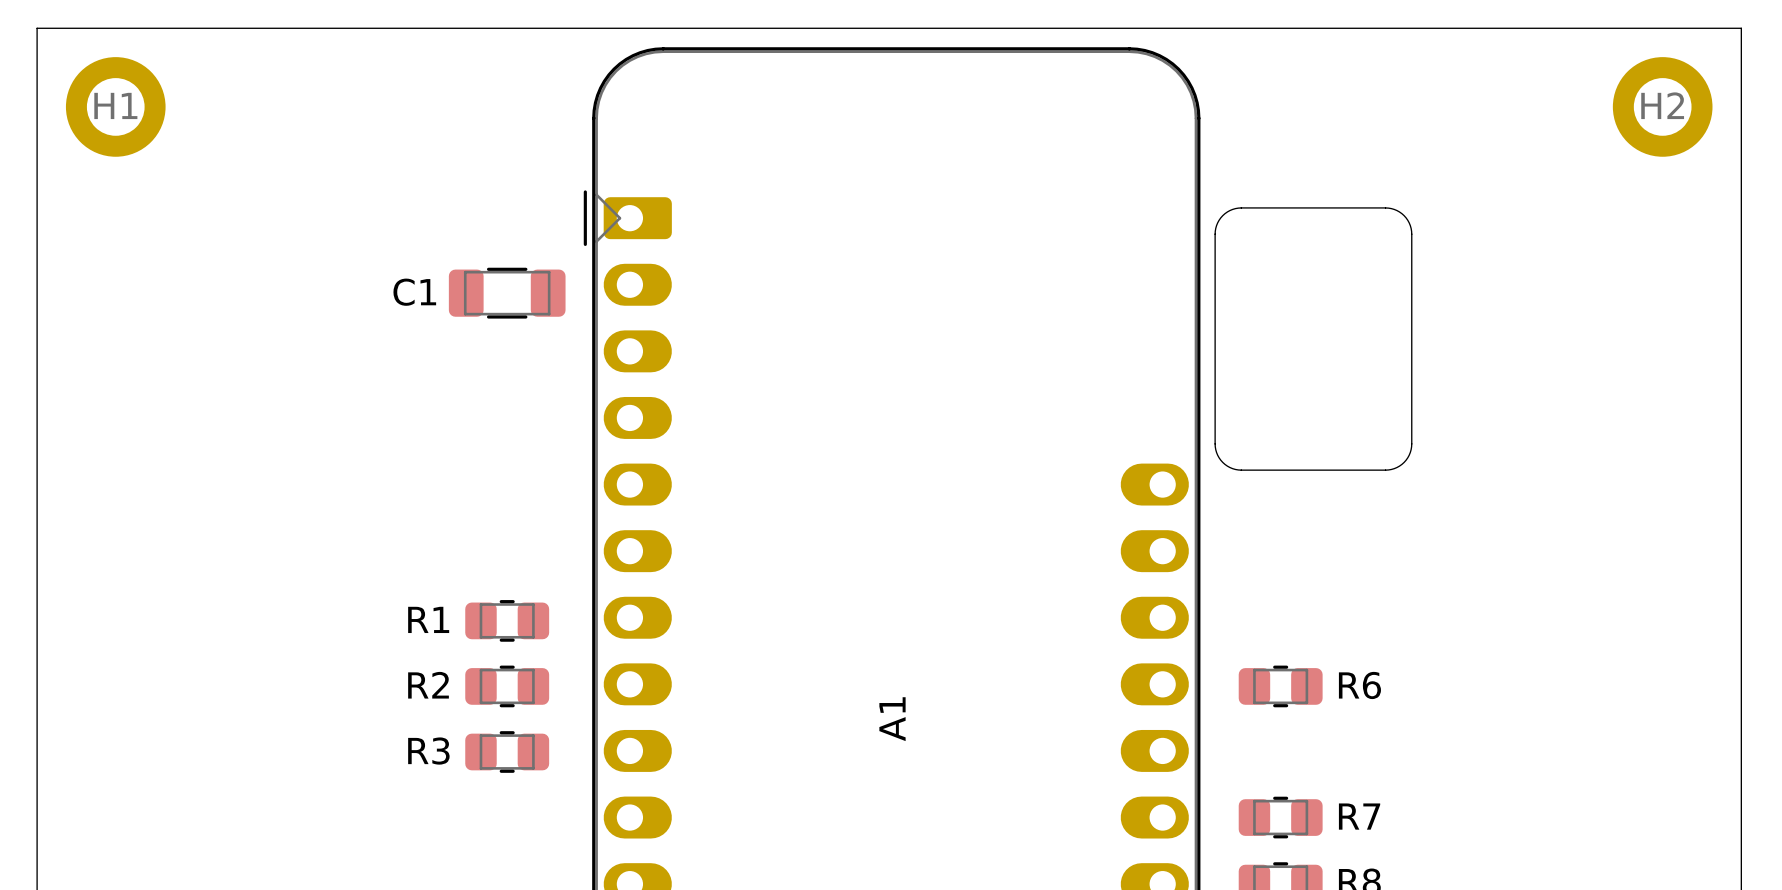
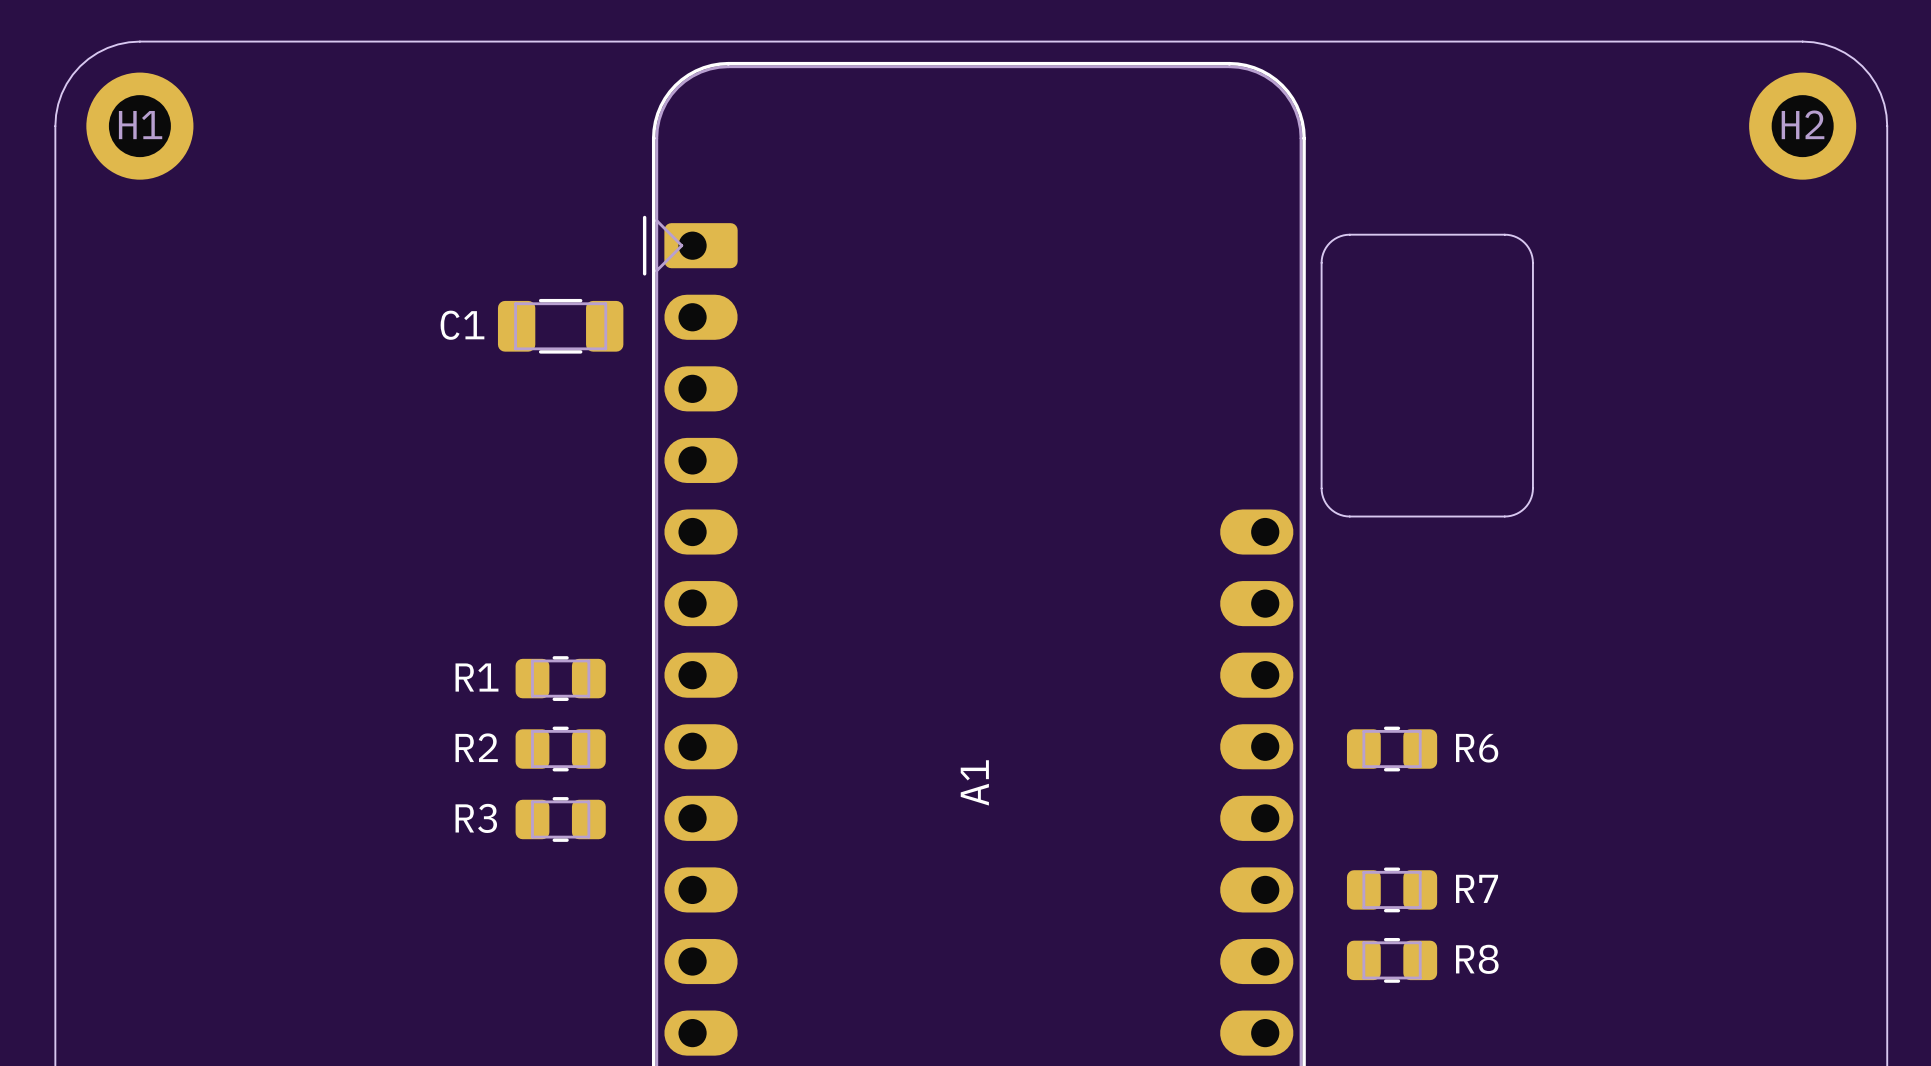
board edge: (115, 28) (37, 28) (37, 106) -> (139, 41) (107, 48) (80, 66) (61, 93) (55, 126)
board edge: (1662, 28) (1741, 28) (1741, 106) -> (1802, 41) (1835, 48) (1862, 66) (1880, 93) (1887, 126)

